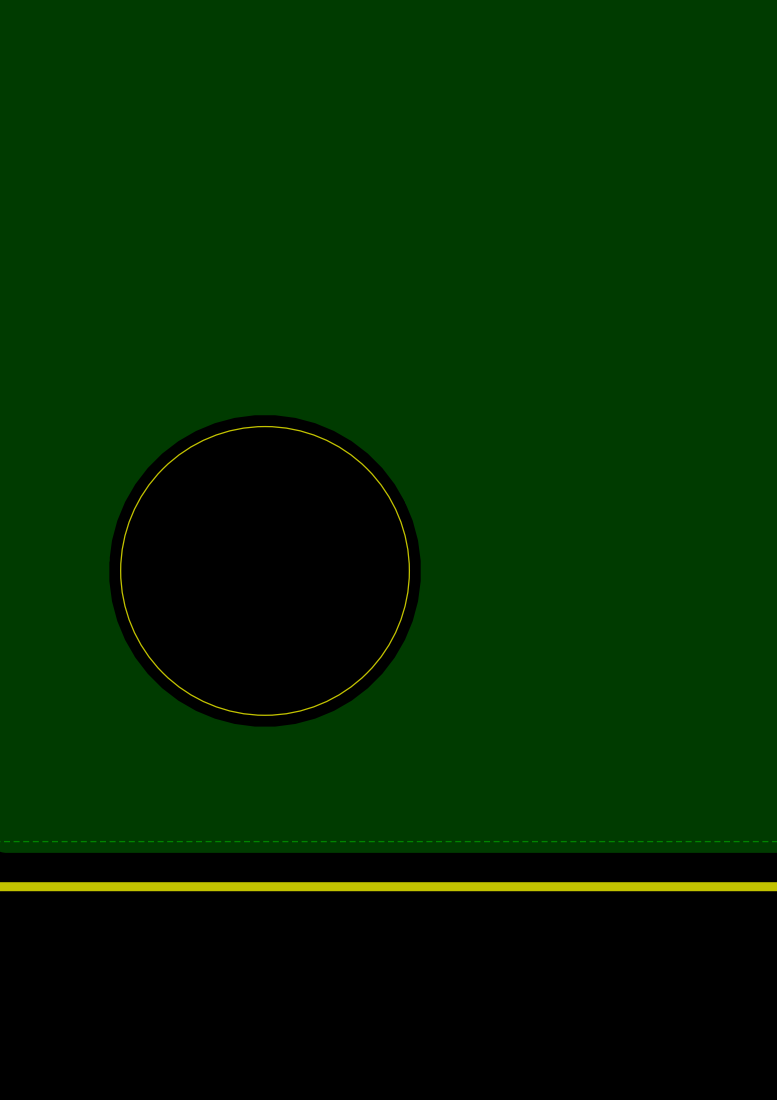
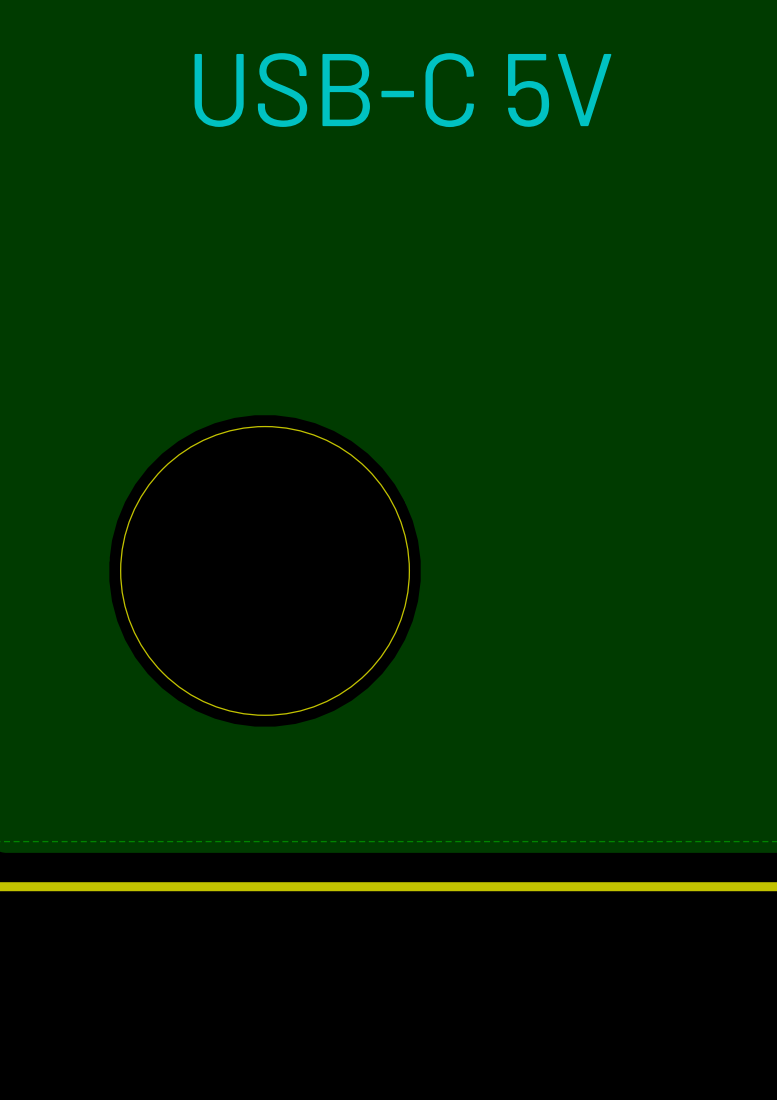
text: none -> USB-C 5V (403, 90)

